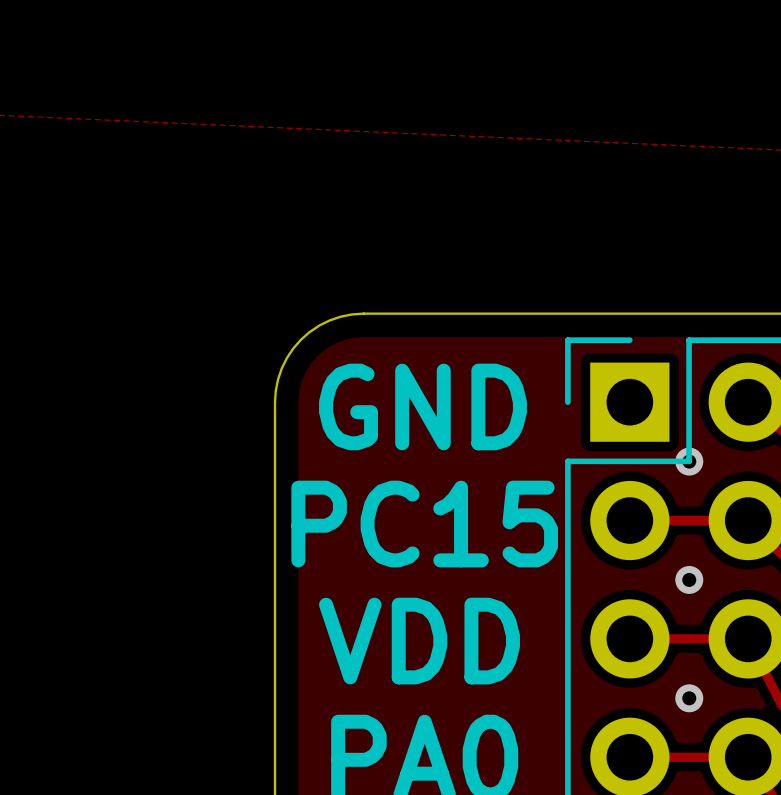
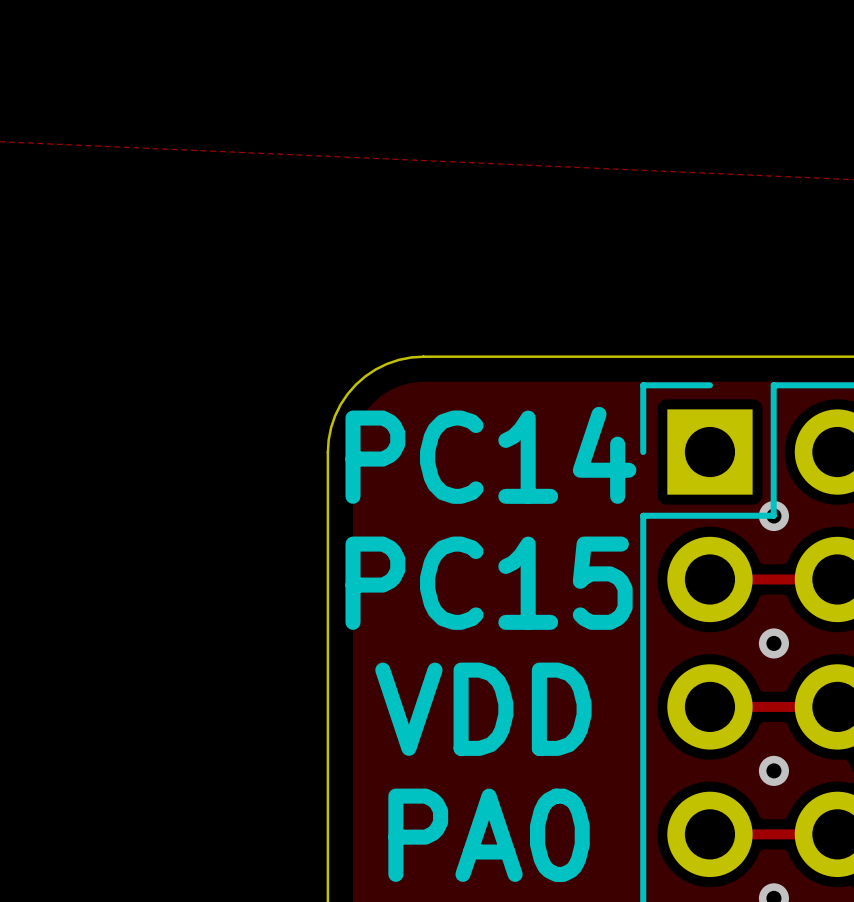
text: GND (422, 406) -> PC14 (490, 455)

